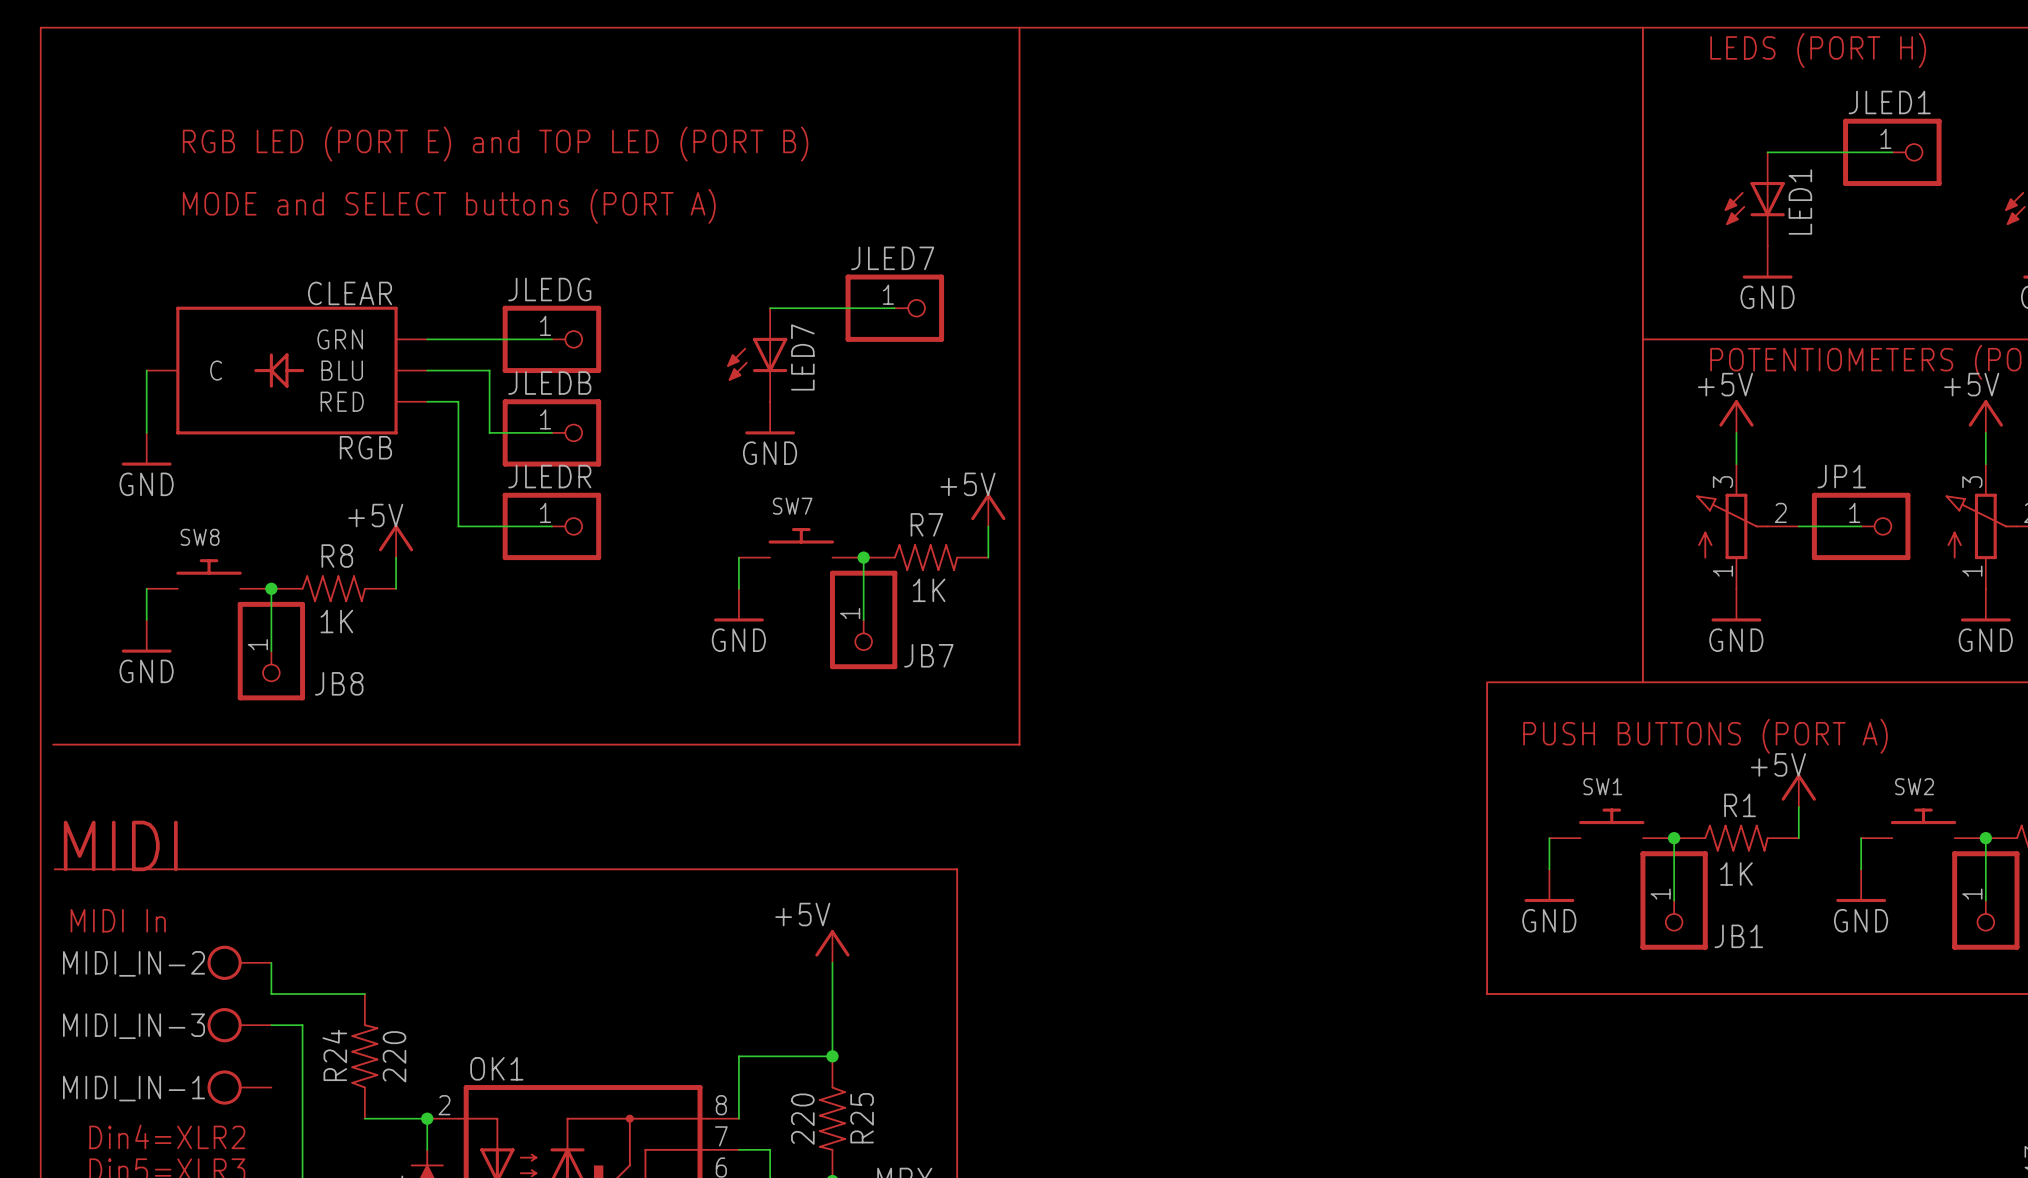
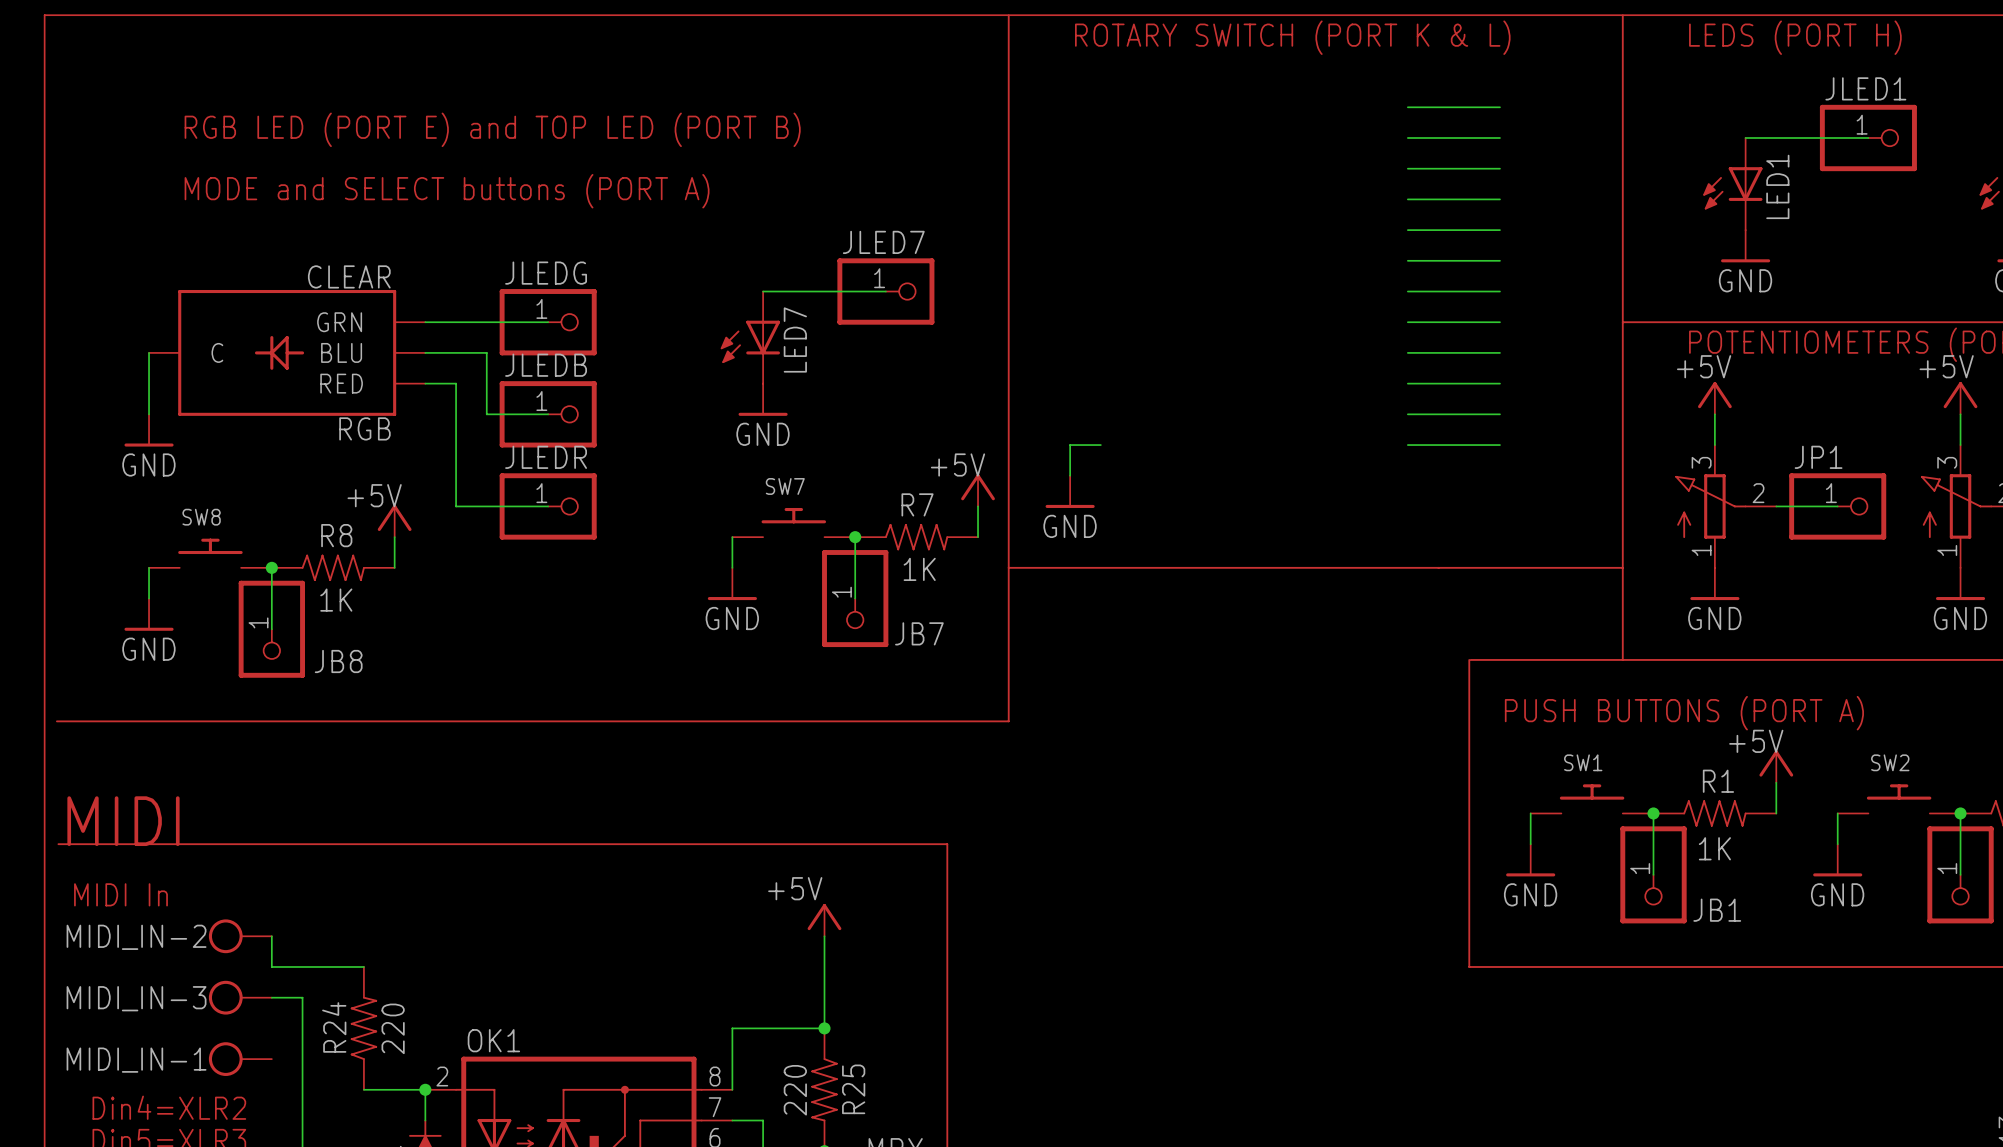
text: none -> ROTARY SWITCH (PORT K & L) (1292, 37)
wire: none -> (1407, 107) (1499, 107)
wire: none -> (1407, 138) (1499, 138)
wire: none -> (1407, 168) (1499, 168)
wire: none -> (1407, 199) (1499, 199)
wire: none -> (1407, 230) (1499, 230)
wire: none -> (1407, 260) (1499, 260)
wire: none -> (1407, 291) (1499, 291)
wire: none -> (1407, 322) (1499, 322)
wire: none -> (1407, 352) (1499, 352)
wire: none -> (1407, 383) (1499, 383)
wire: none -> (1407, 414) (1499, 414)
wire: none -> (1100, 445) (1070, 445) (1070, 475)
wire: none -> (1407, 445) (1499, 445)
power symbol: none -> GND (1070, 491)
line: none -> (1008, 567) (1622, 567)

